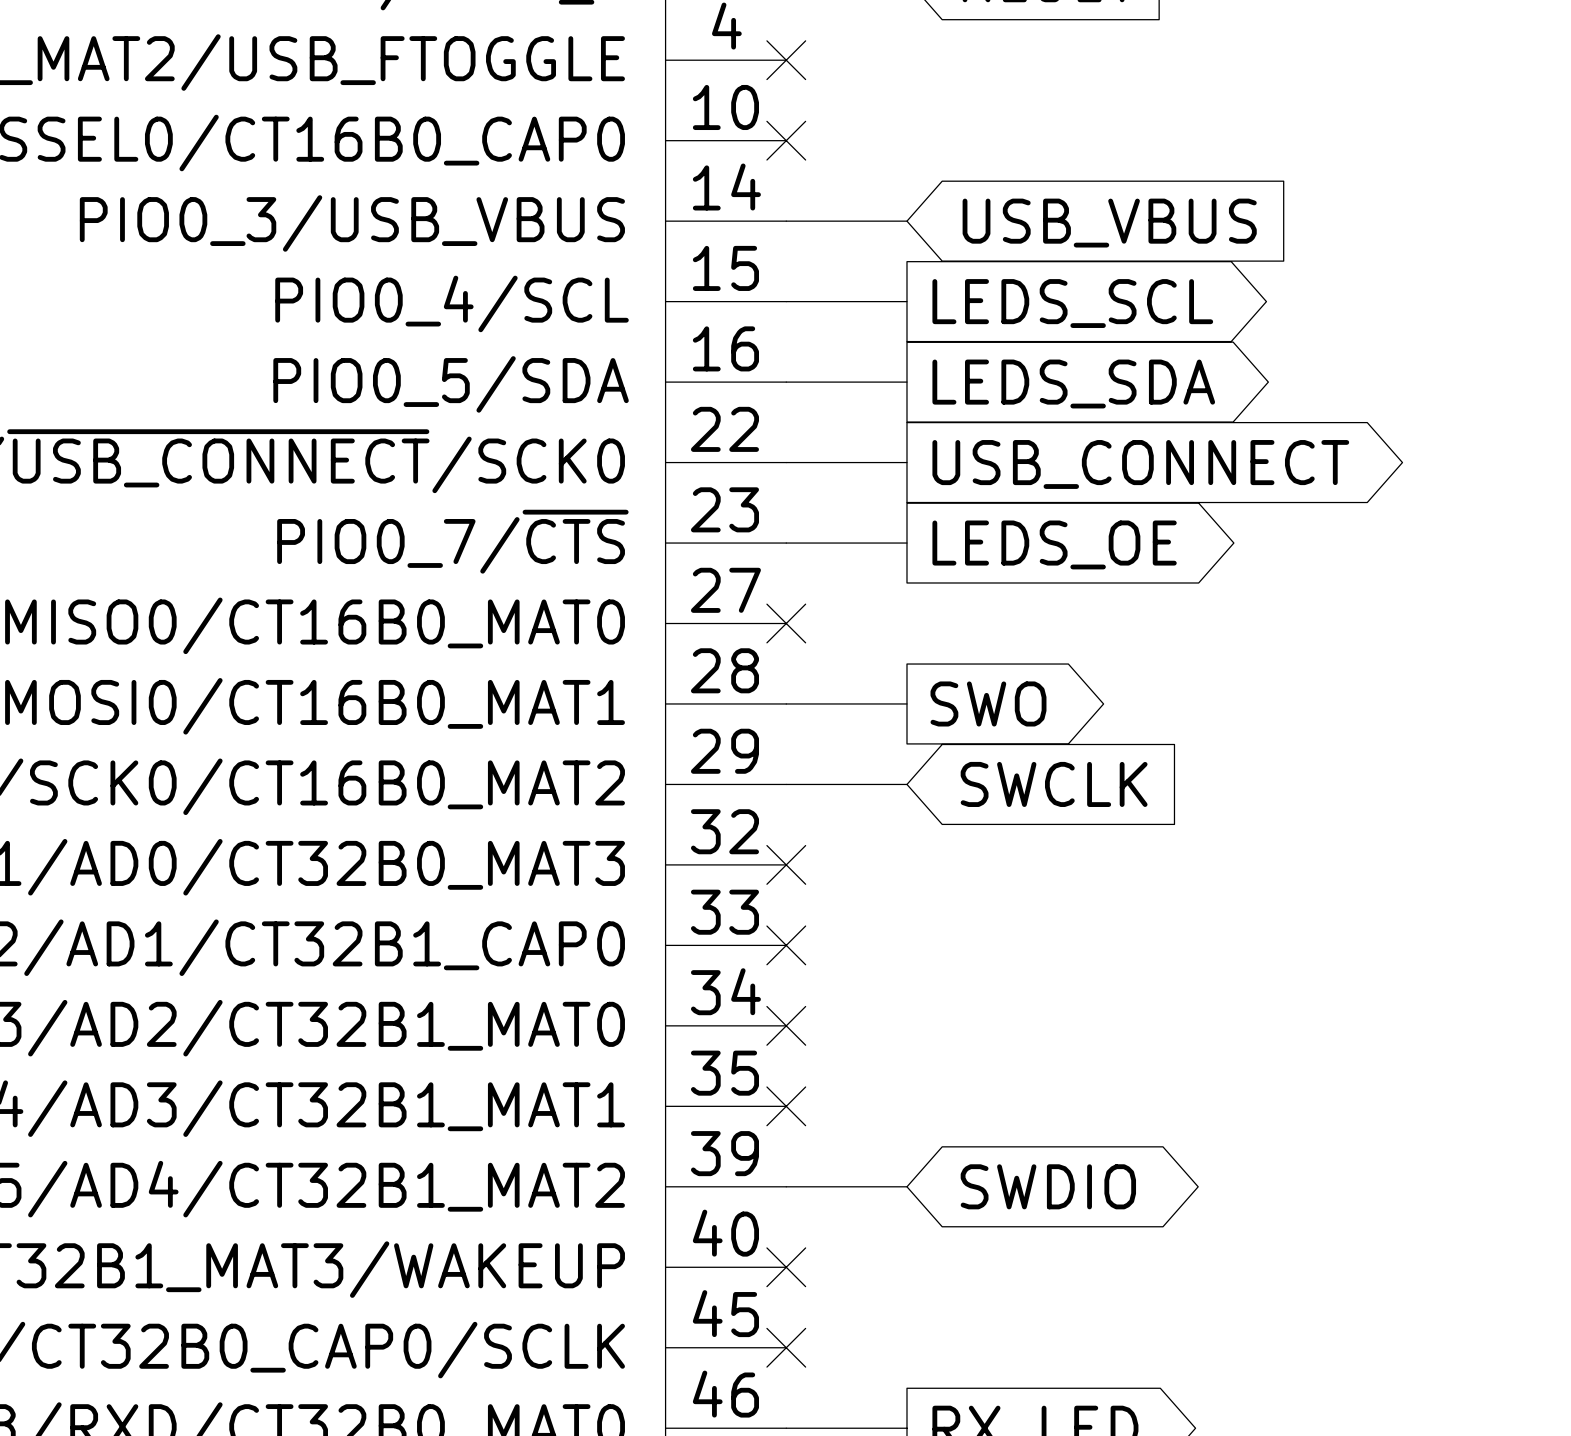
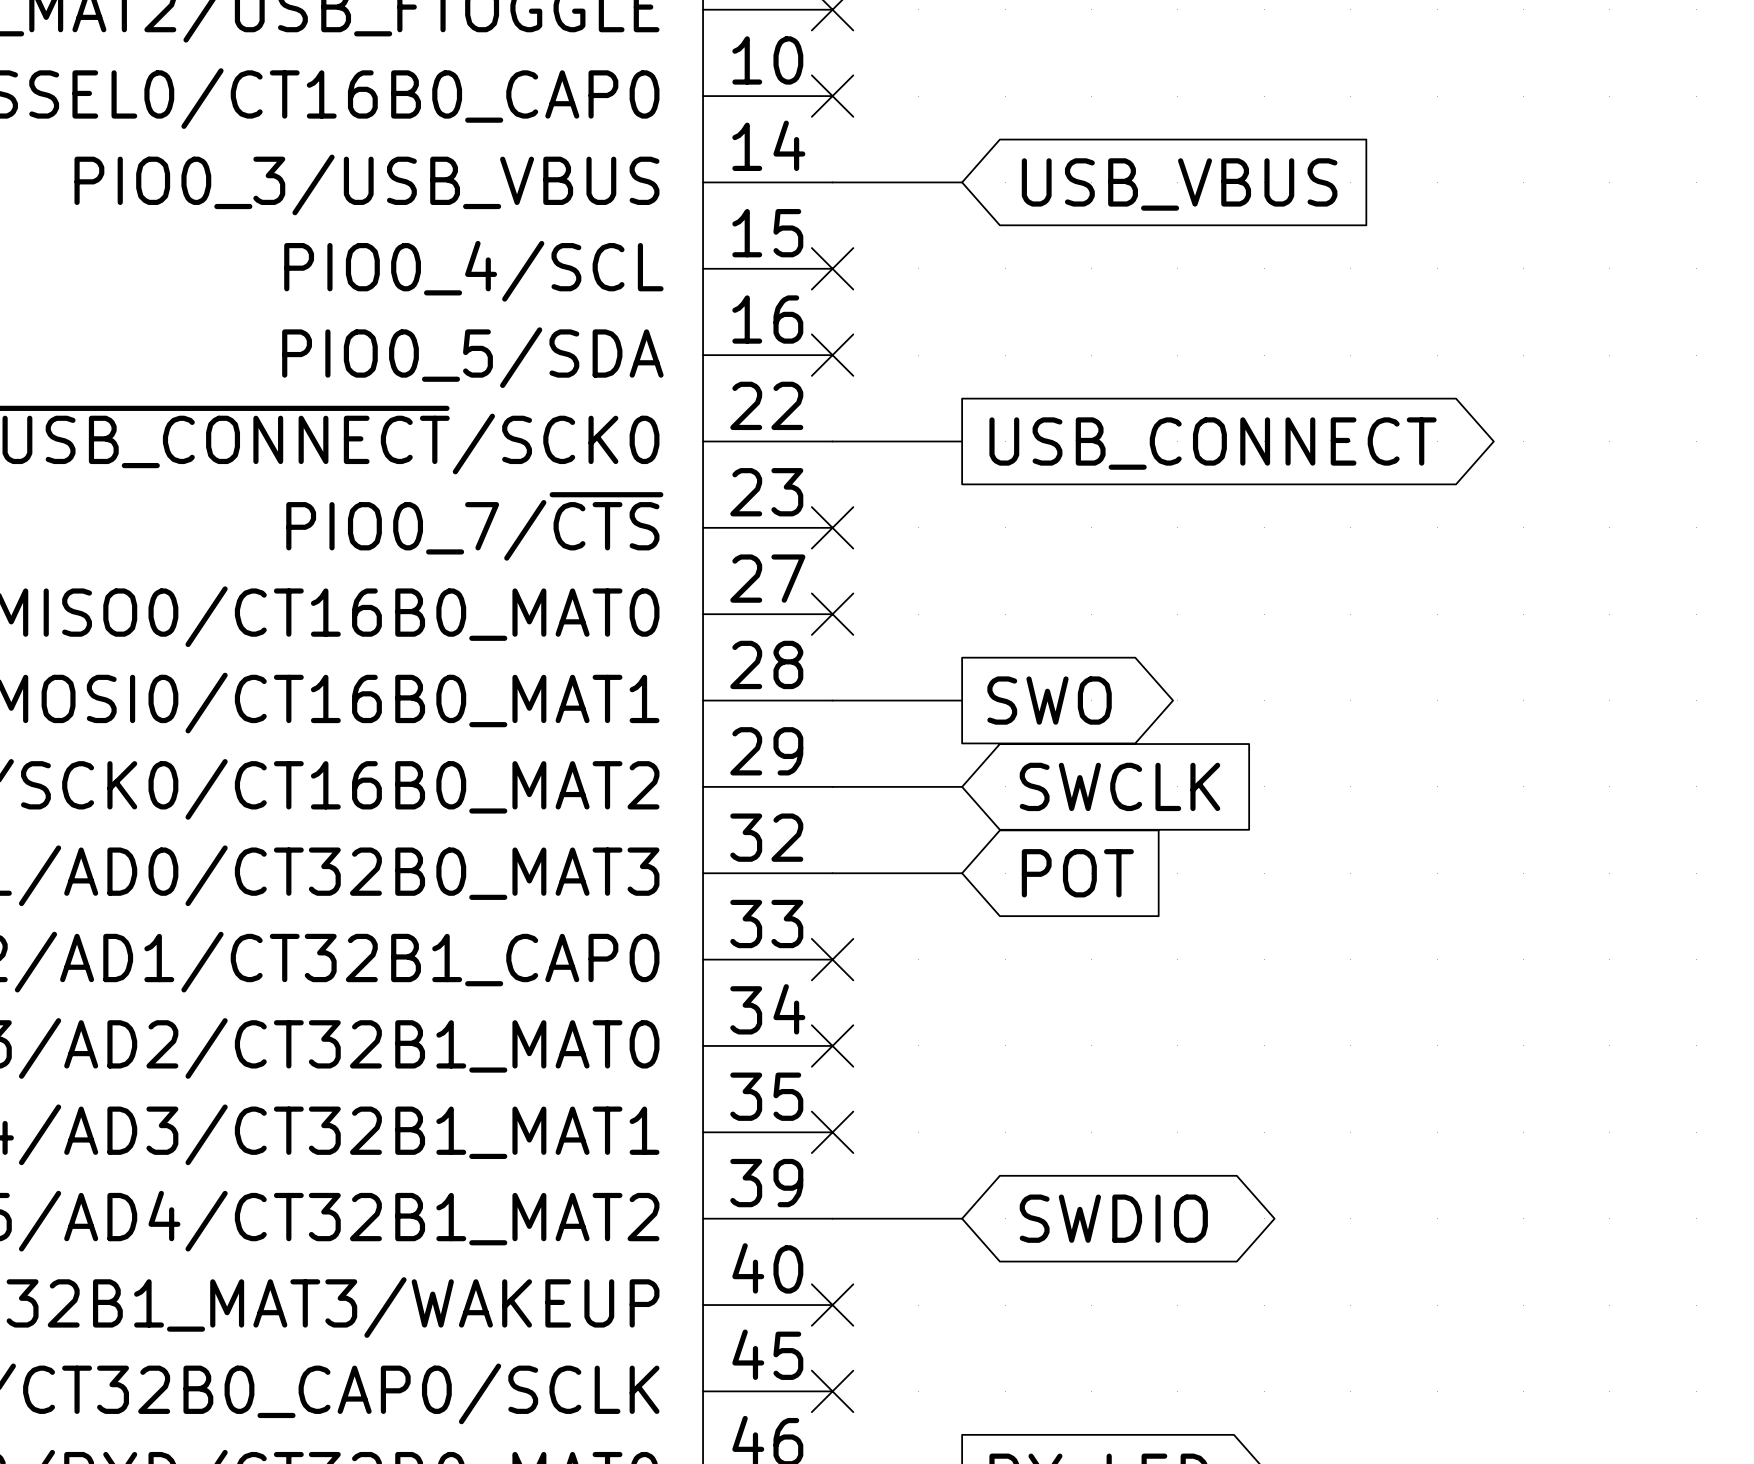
wire: (786, 301) (906, 301) -> none
no-connect mark: none -> (832, 268)
global label: LEDS_SCL (1072, 303) -> none
wire: (786, 382) (906, 382) -> none
no-connect mark: none -> (832, 355)
global label: LEDS_SDA (1073, 384) -> none
wire: (786, 543) (906, 543) -> (832, 873) (962, 873)
no-connect mark: none -> (832, 527)
global label: LEDS_OE (1054, 544) -> none
no-connect mark: (786, 864) -> none
global label: none -> POT (1077, 873)

